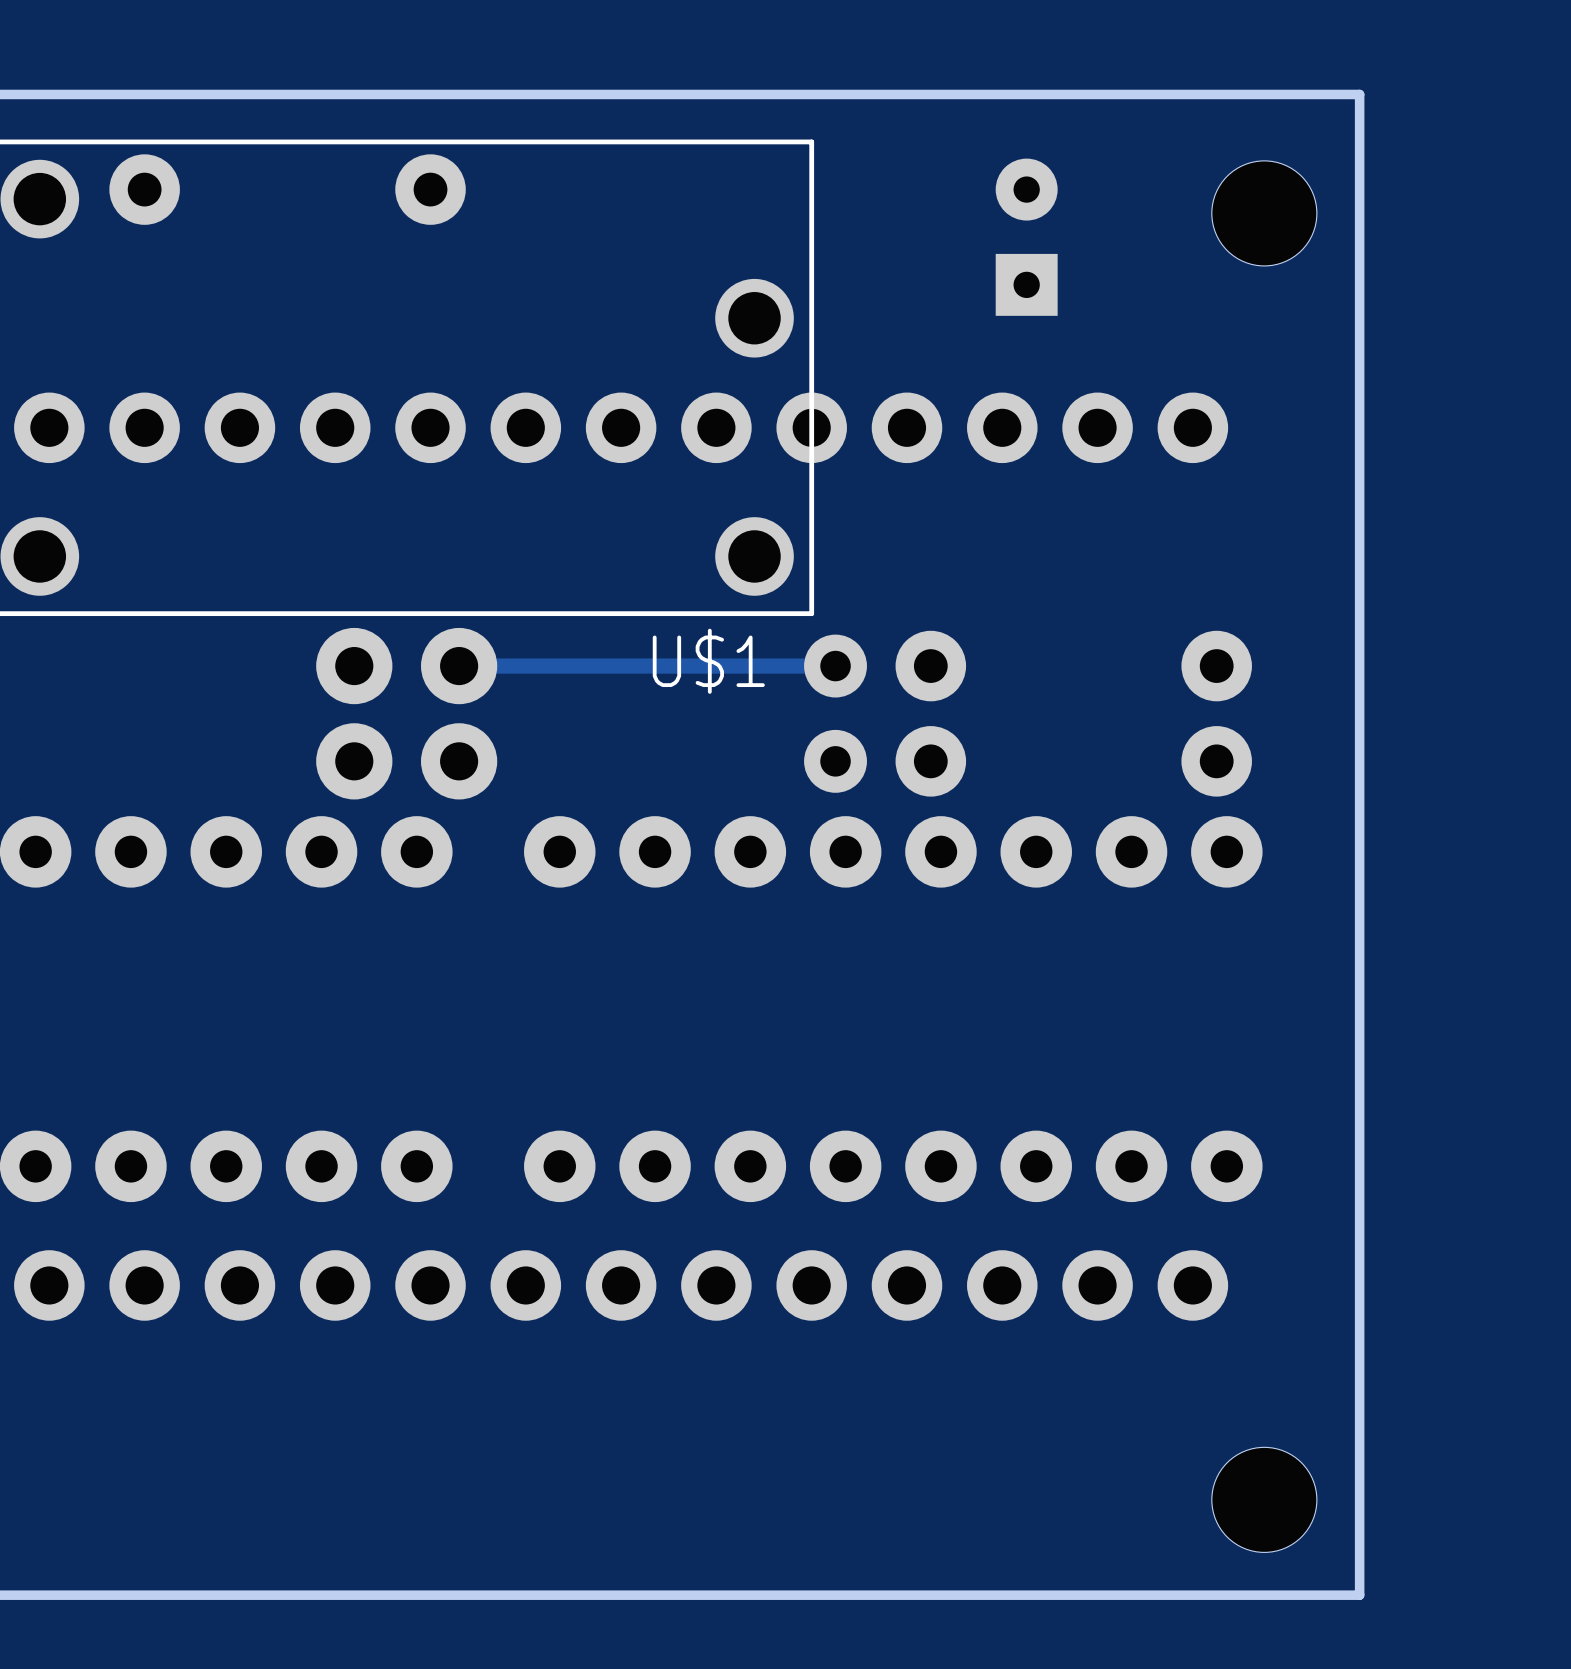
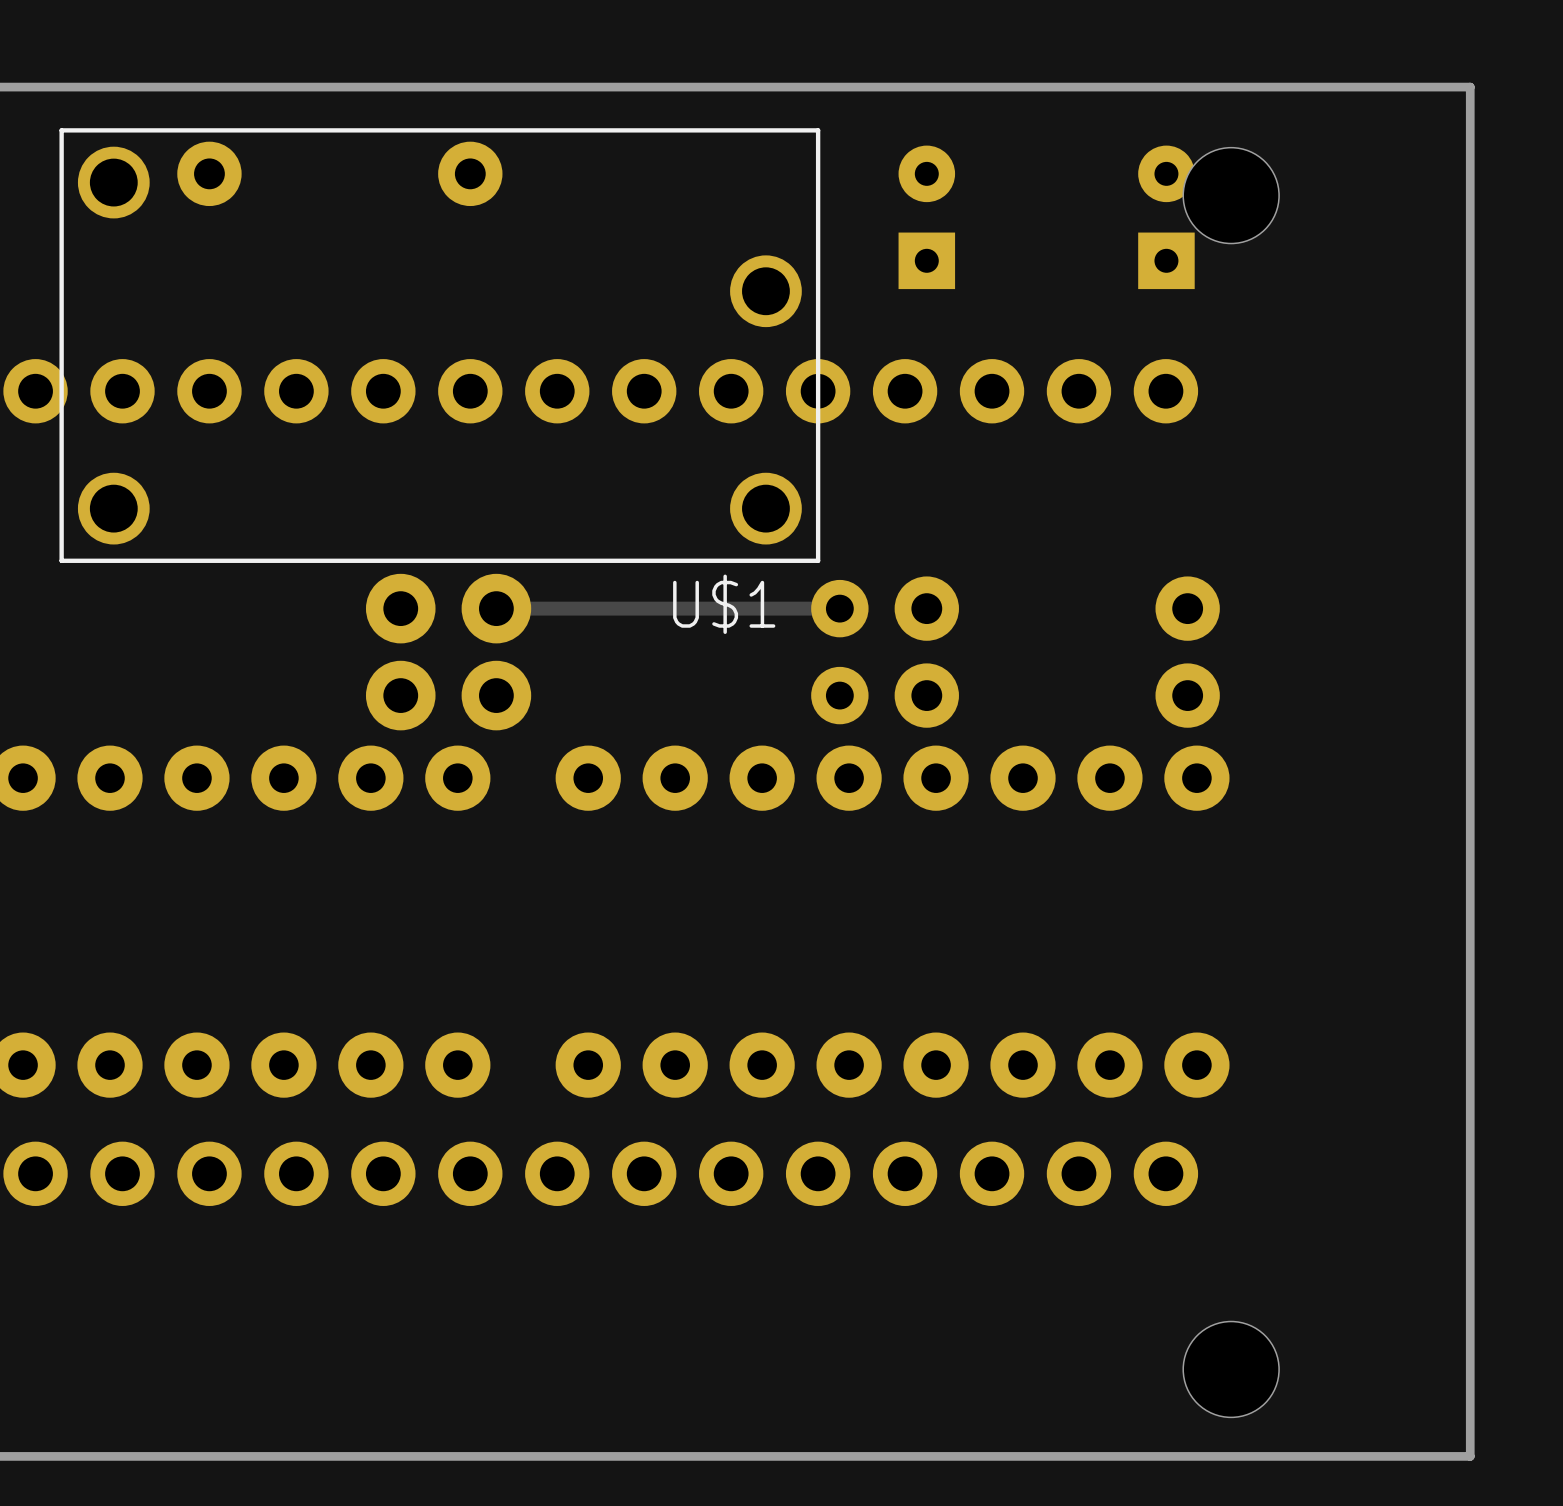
board edge: (1359, 94) (1359, 1595) -> (1318, 87) (1470, 87) (1470, 1456) (1318, 1456)
part: none -> (926, 217)
part: (1026, 237) -> none
part: none -> (1166, 217)

